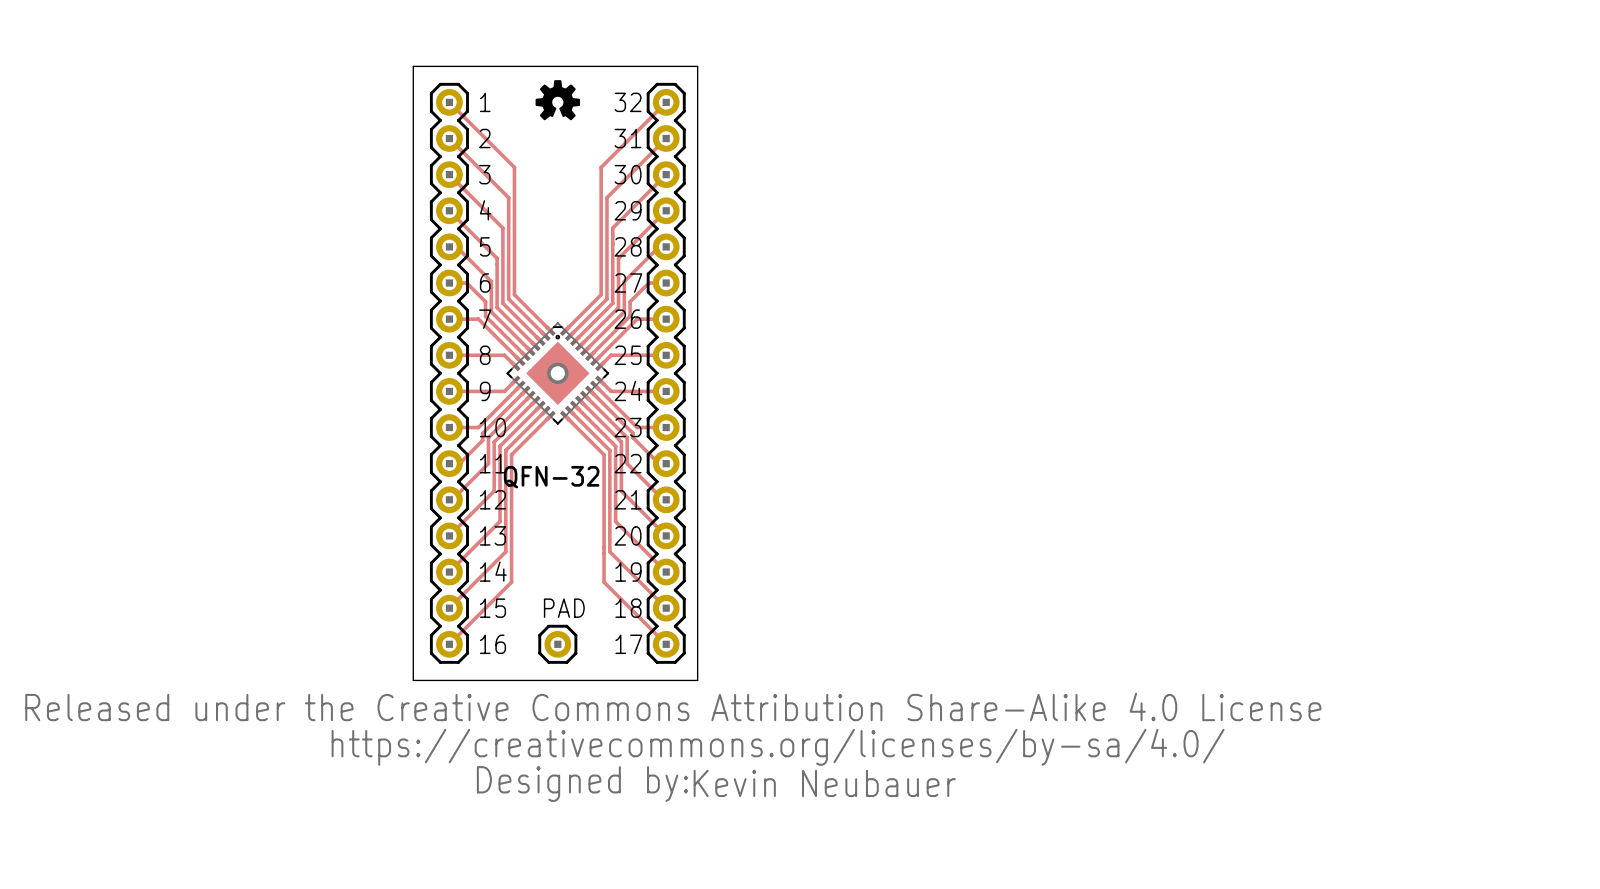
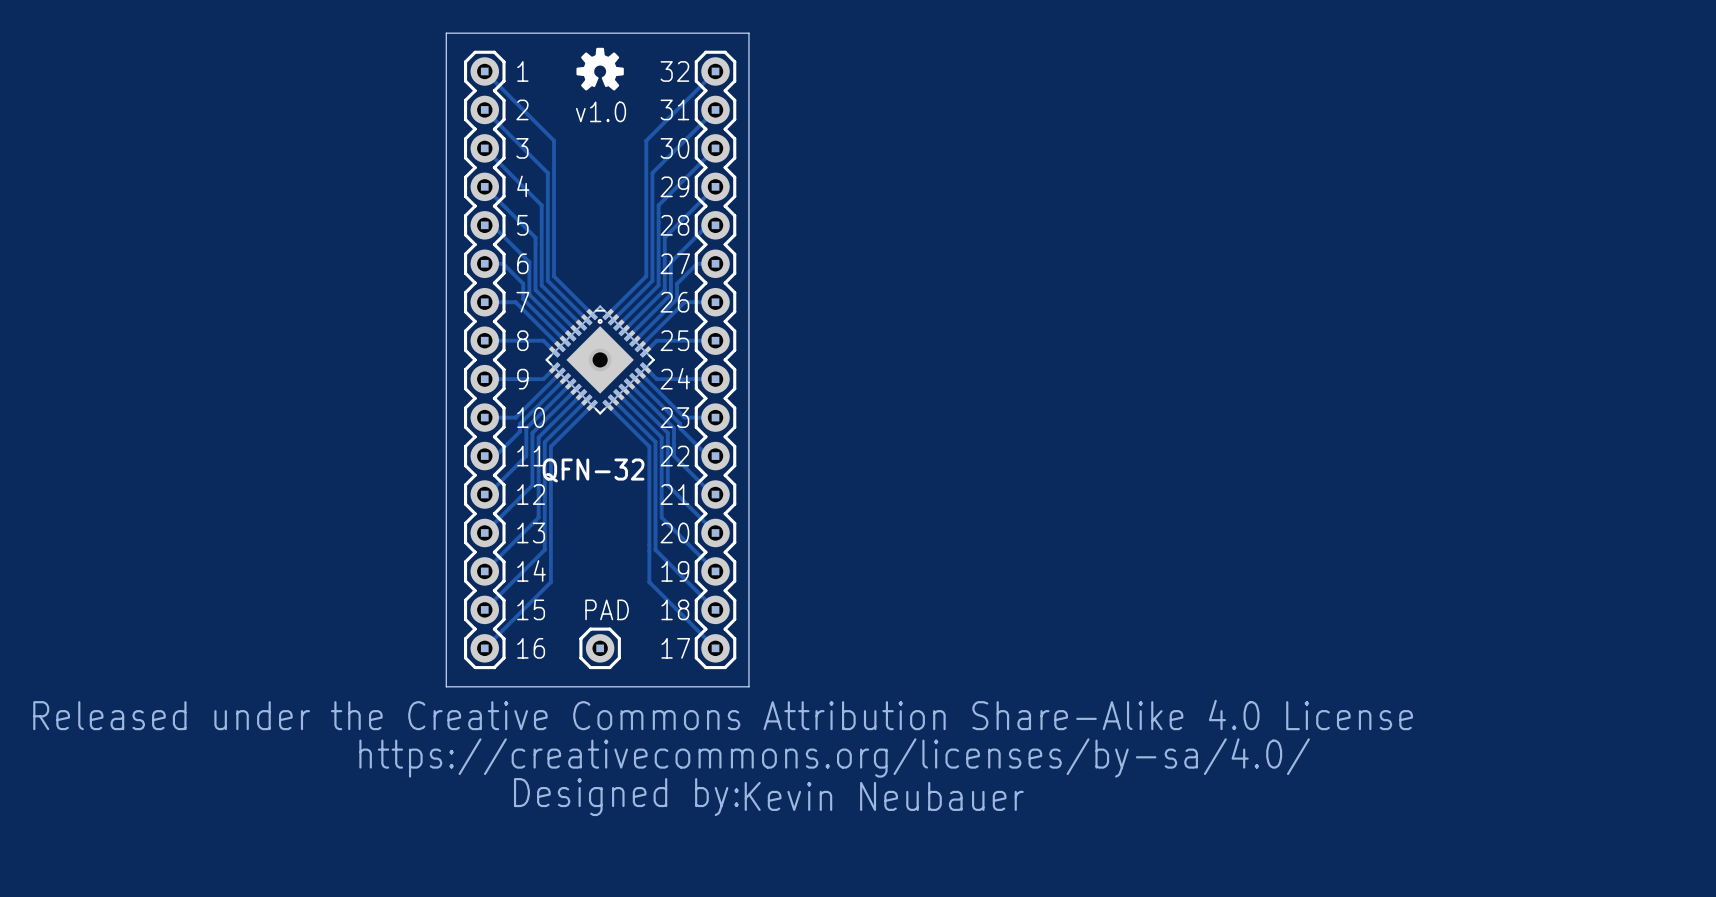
text: none -> v1.0 (601, 111)

